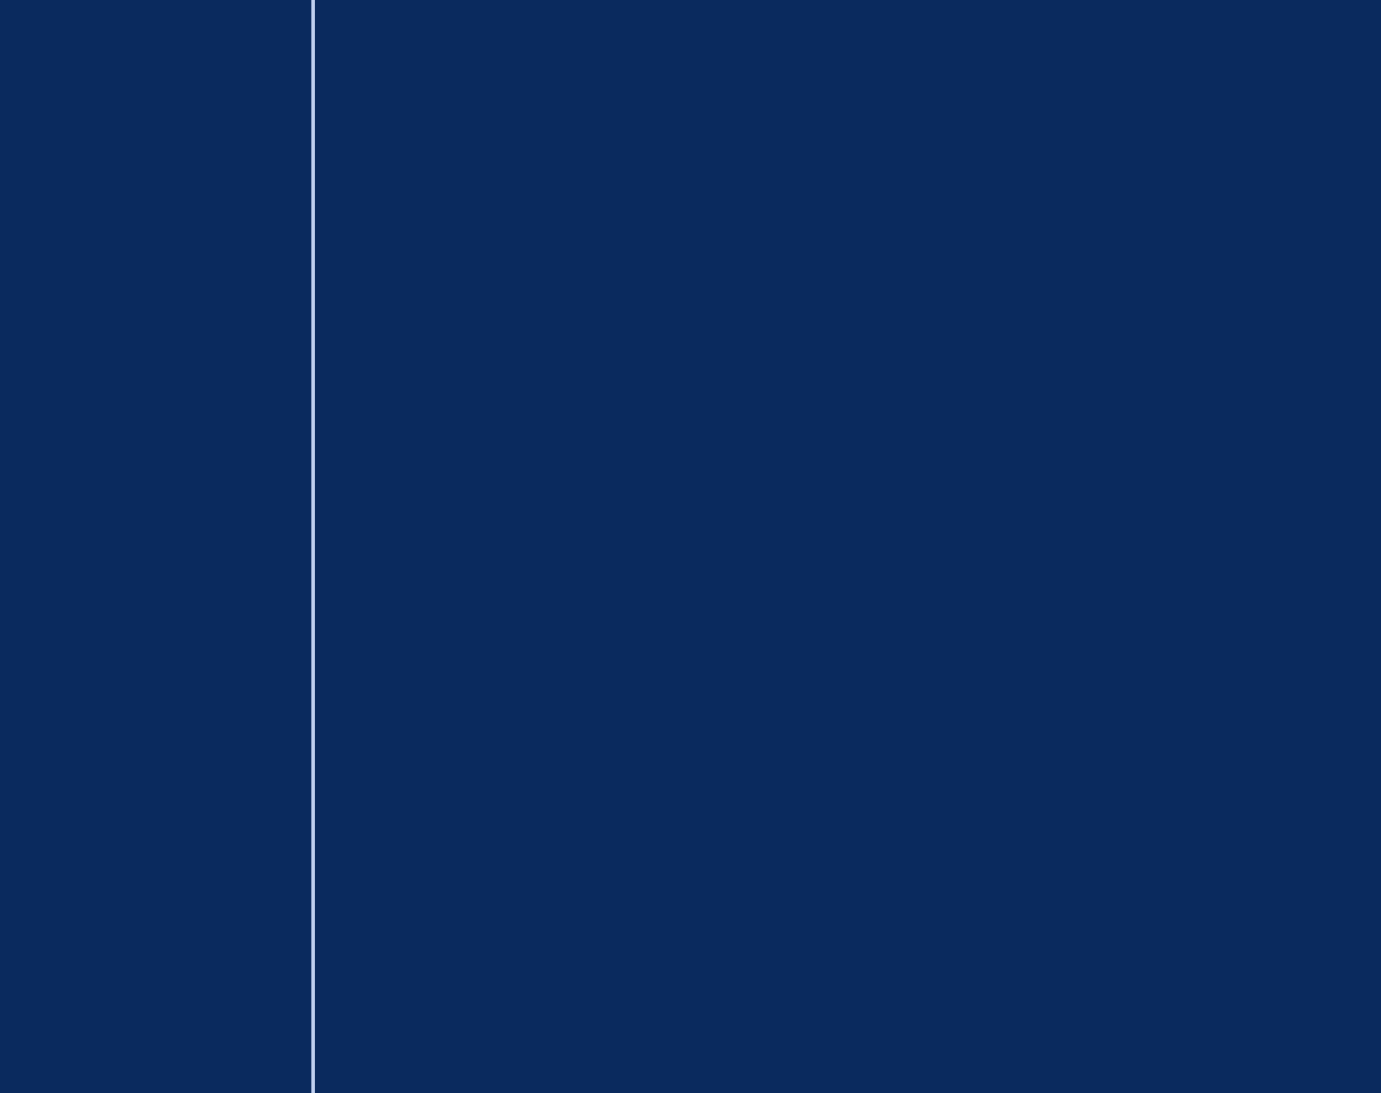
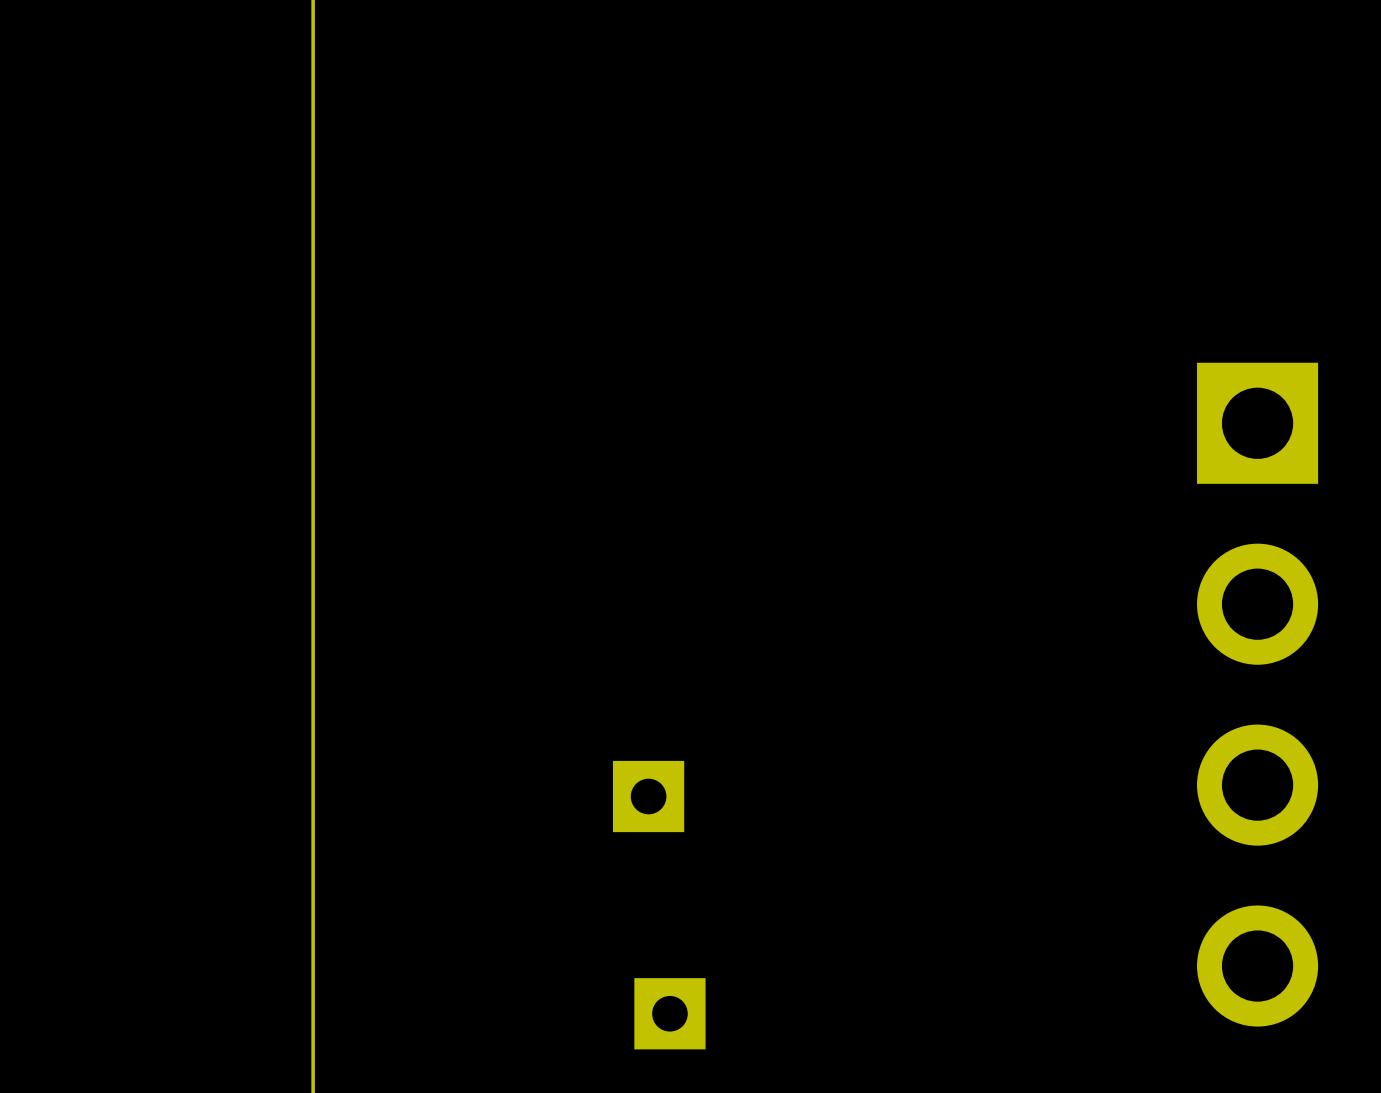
part: none -> (1257, 694)
part: none -> (648, 796)
part: none -> (669, 1013)

